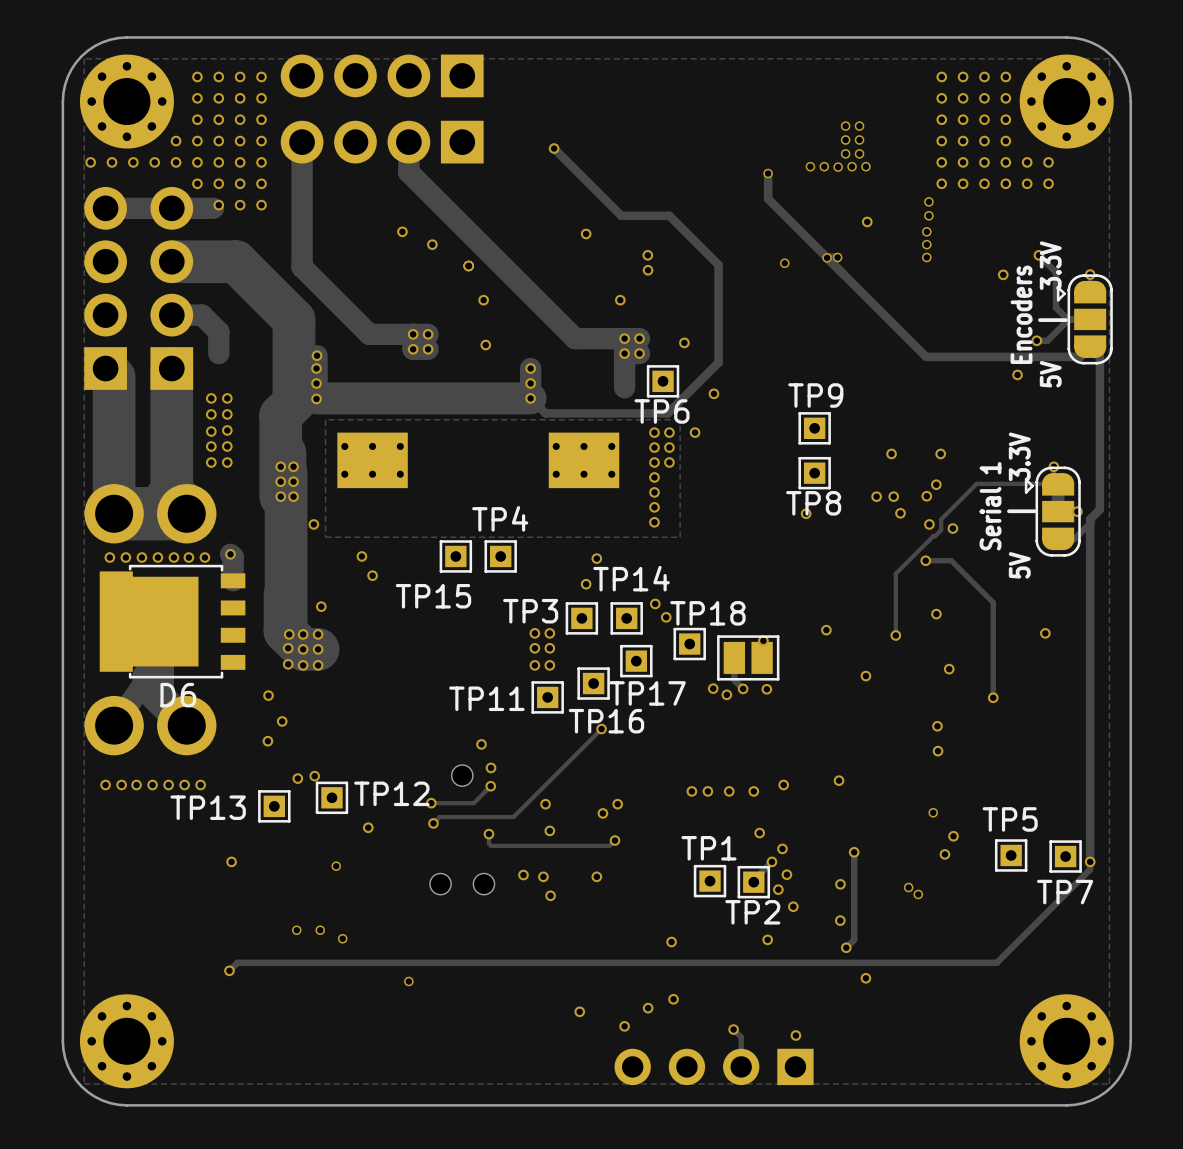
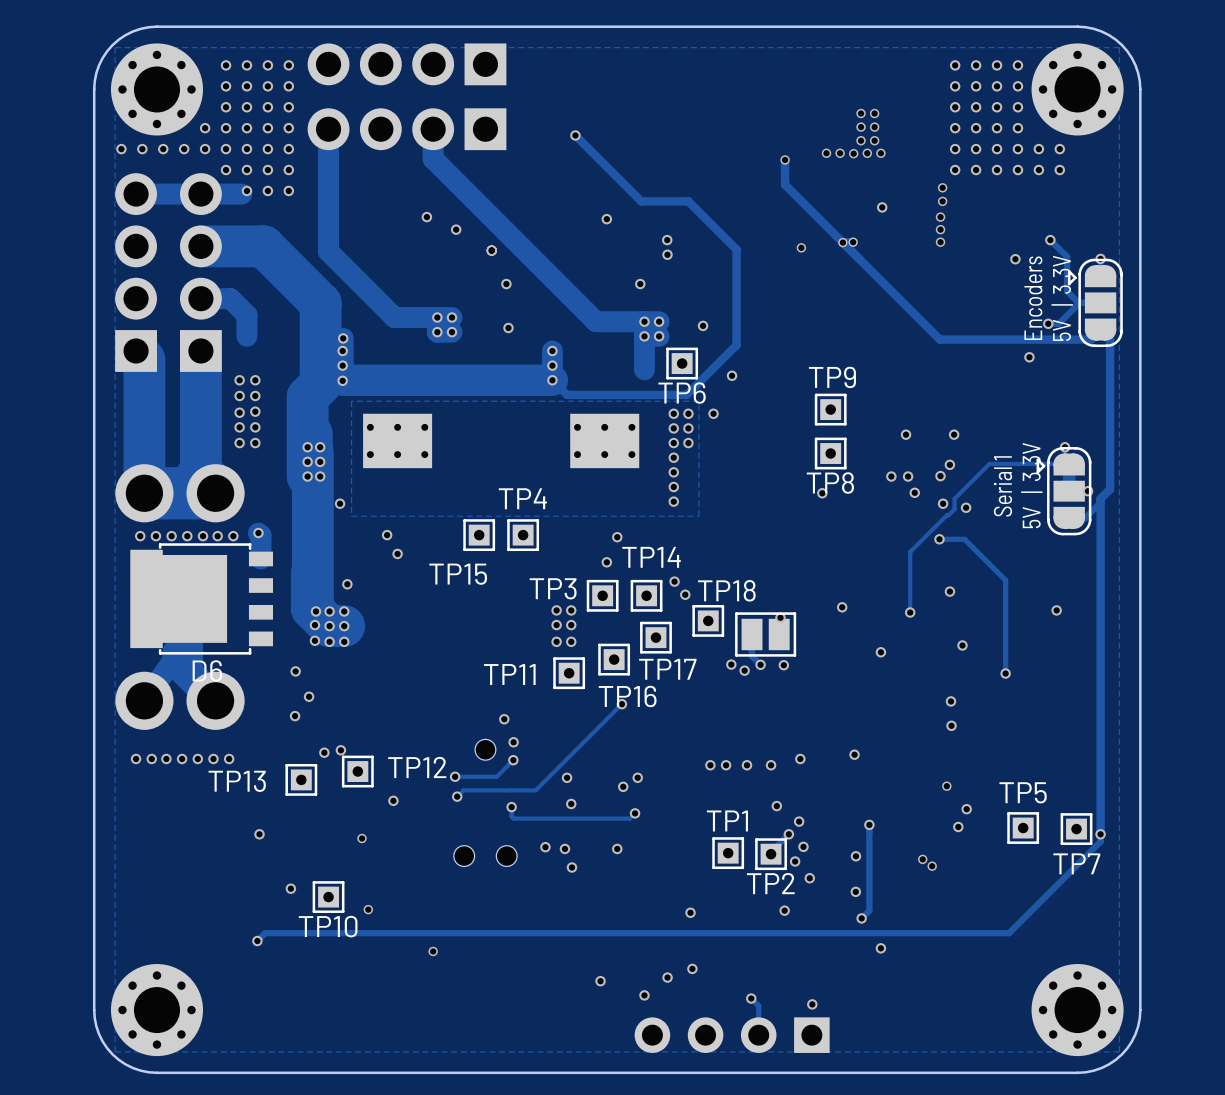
via: none -> (290, 888)
TP10: none -> (328, 897)
via: (296, 930) -> none
via: (320, 930) -> none

